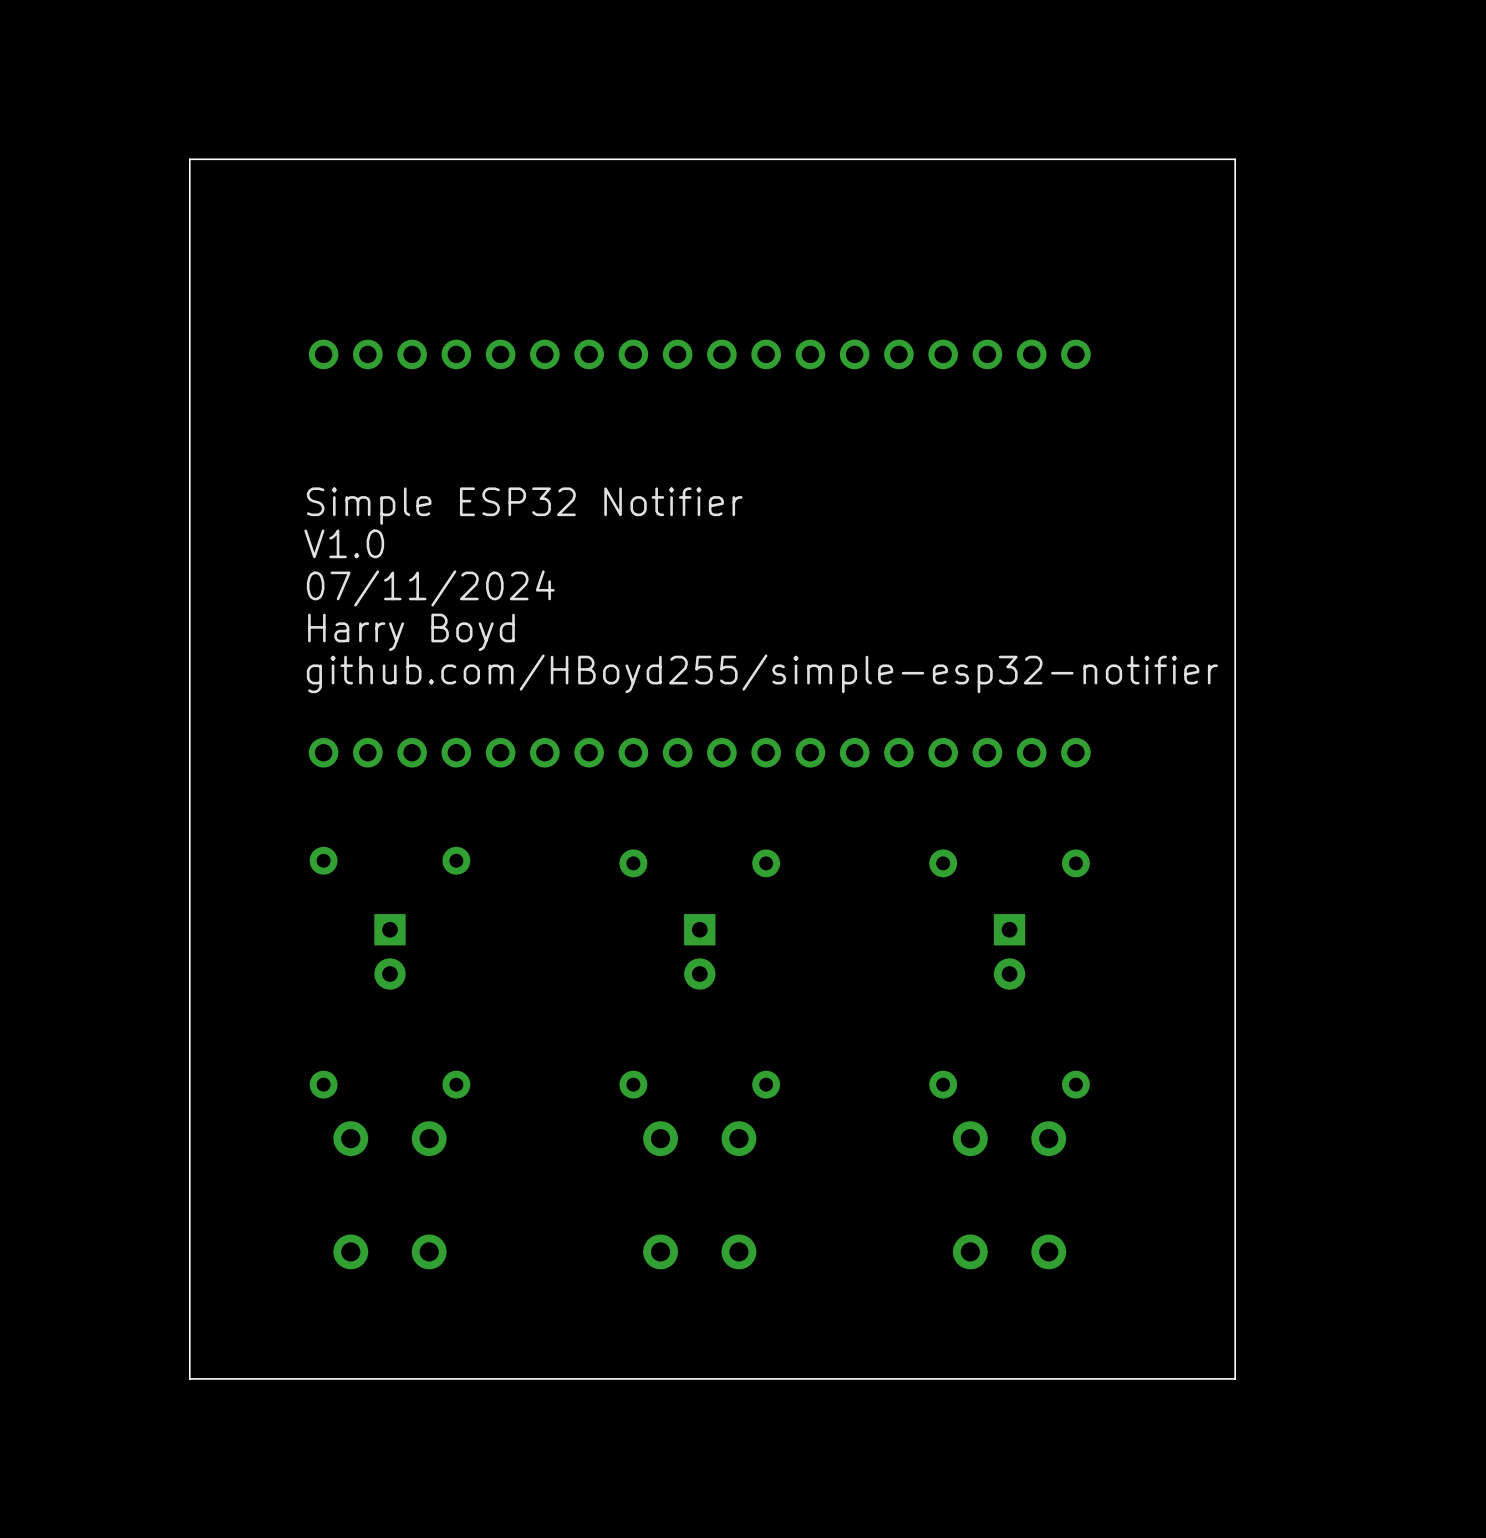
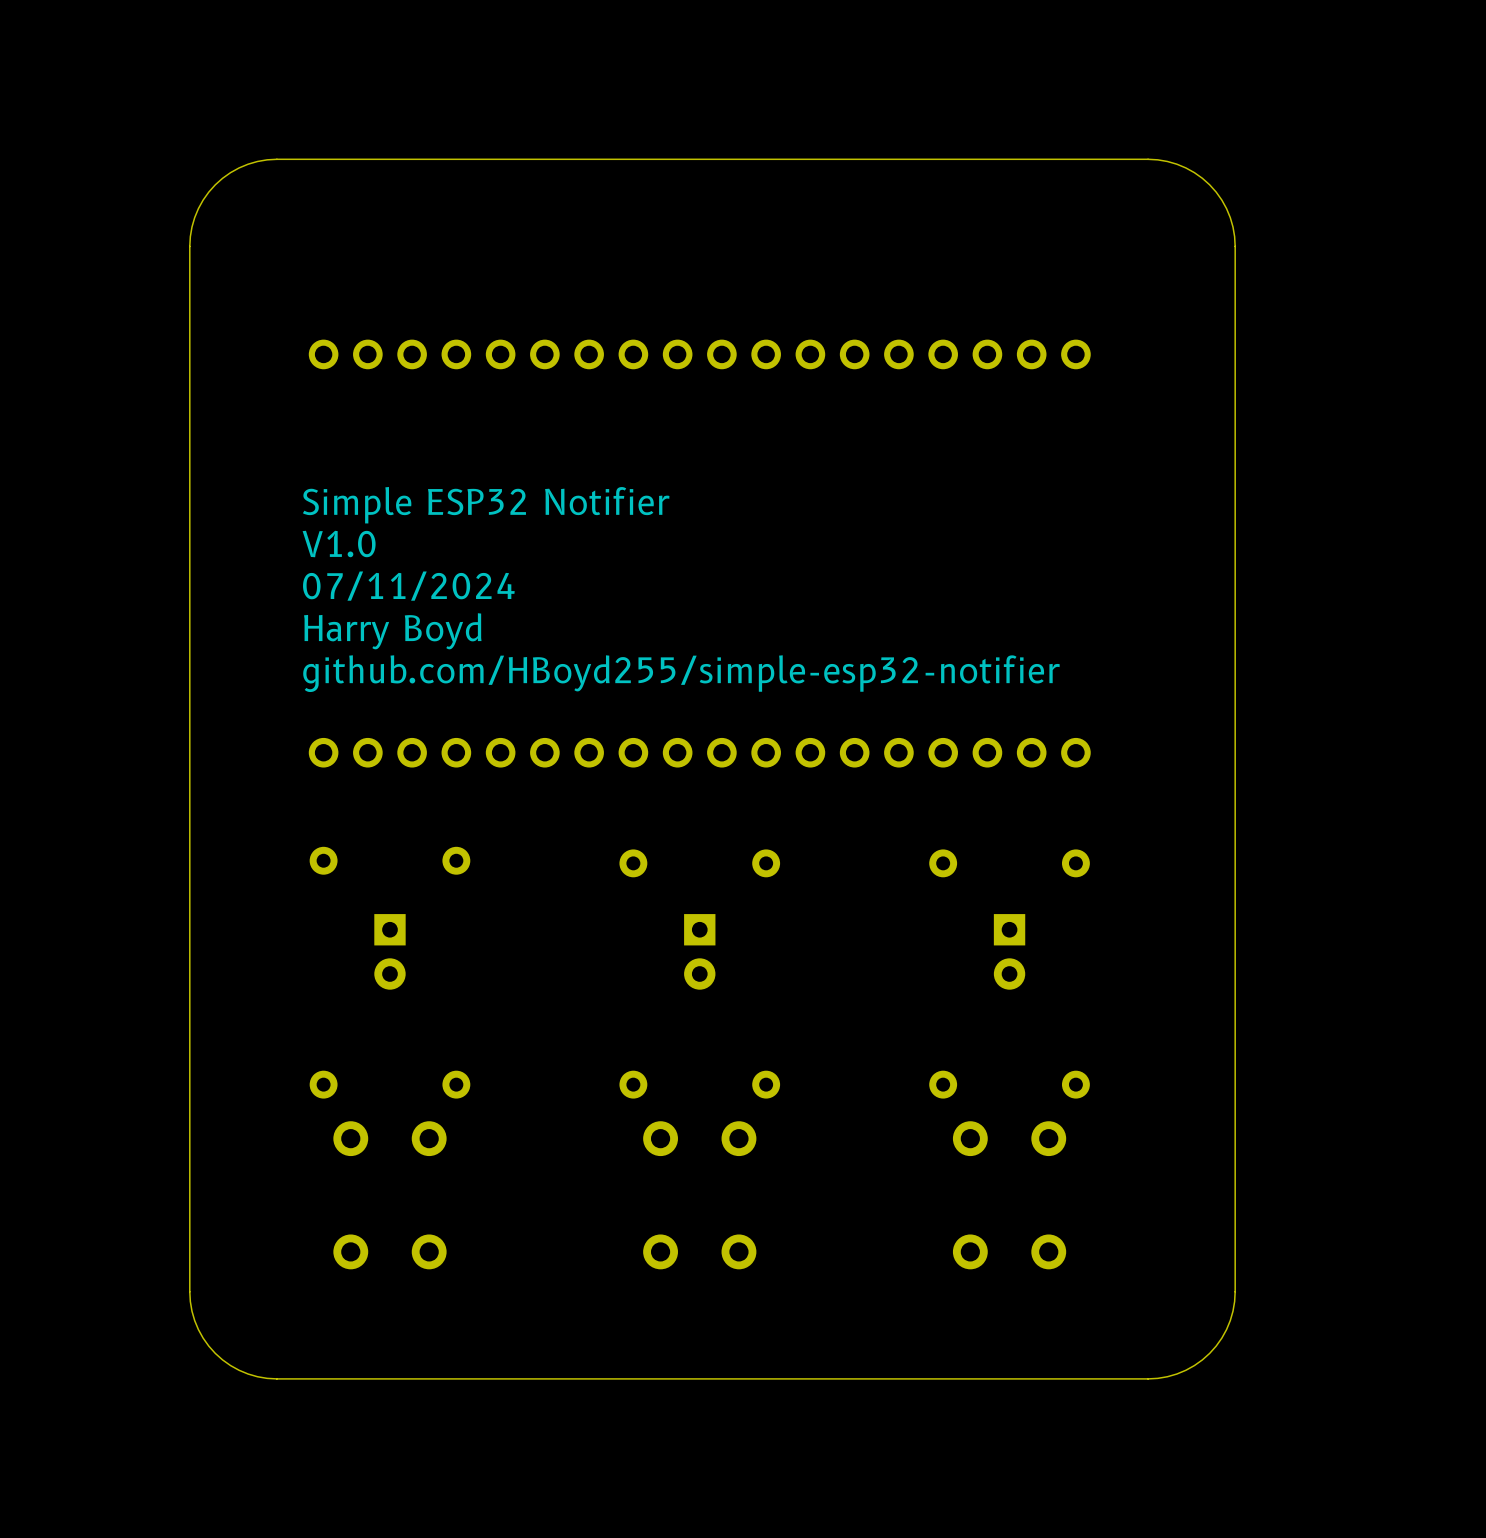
board edge: (276, 159) (189, 159) (189, 246) -> (276, 159) (248, 164) (230, 172) (215, 184) (203, 200) (194, 217) (189, 246)
board edge: (1148, 159) (1235, 159) (1235, 246) -> (1148, 159) (1176, 164) (1194, 172) (1209, 184) (1226, 208) (1232, 227) (1235, 246)
board edge: (189, 1291) (189, 1378) (276, 1378) -> (189, 1291) (191, 1311) (198, 1329) (215, 1353) (239, 1370) (257, 1376) (276, 1378)
board edge: (1235, 1291) (1235, 1378) (1148, 1378) -> (1235, 1291) (1232, 1311) (1226, 1329) (1209, 1353) (1194, 1365) (1176, 1374) (1148, 1378)

